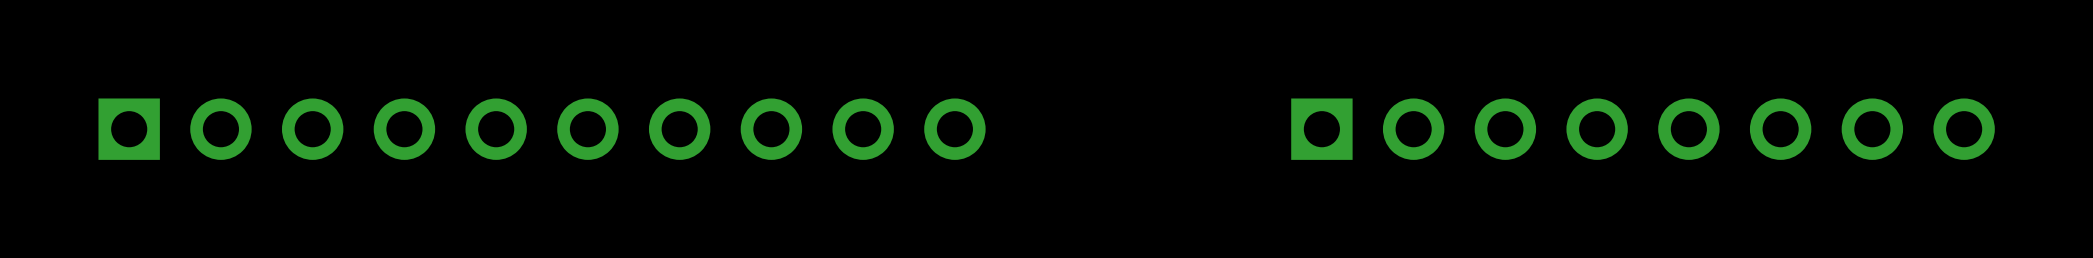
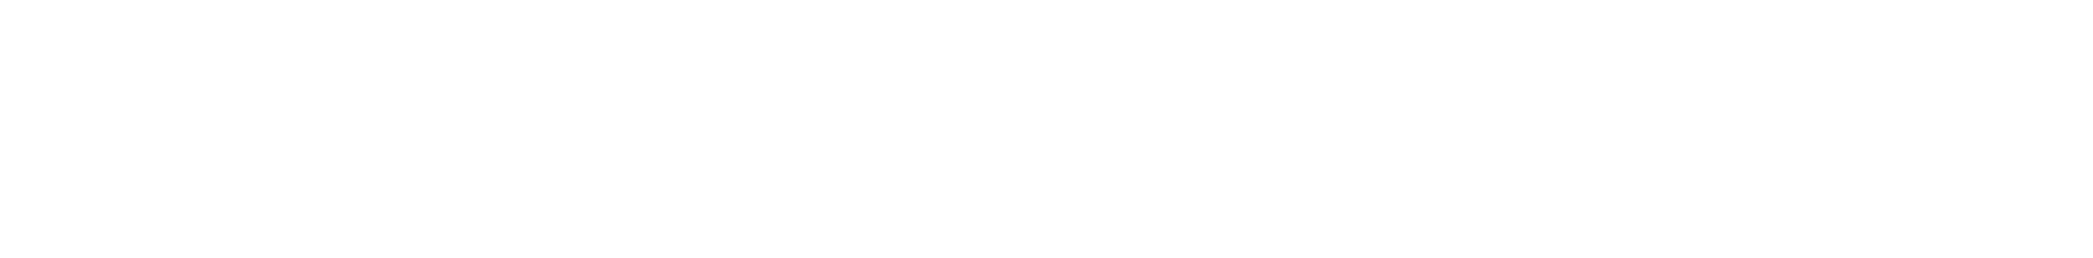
part: (542, 129) -> none
part: (1643, 129) -> none

